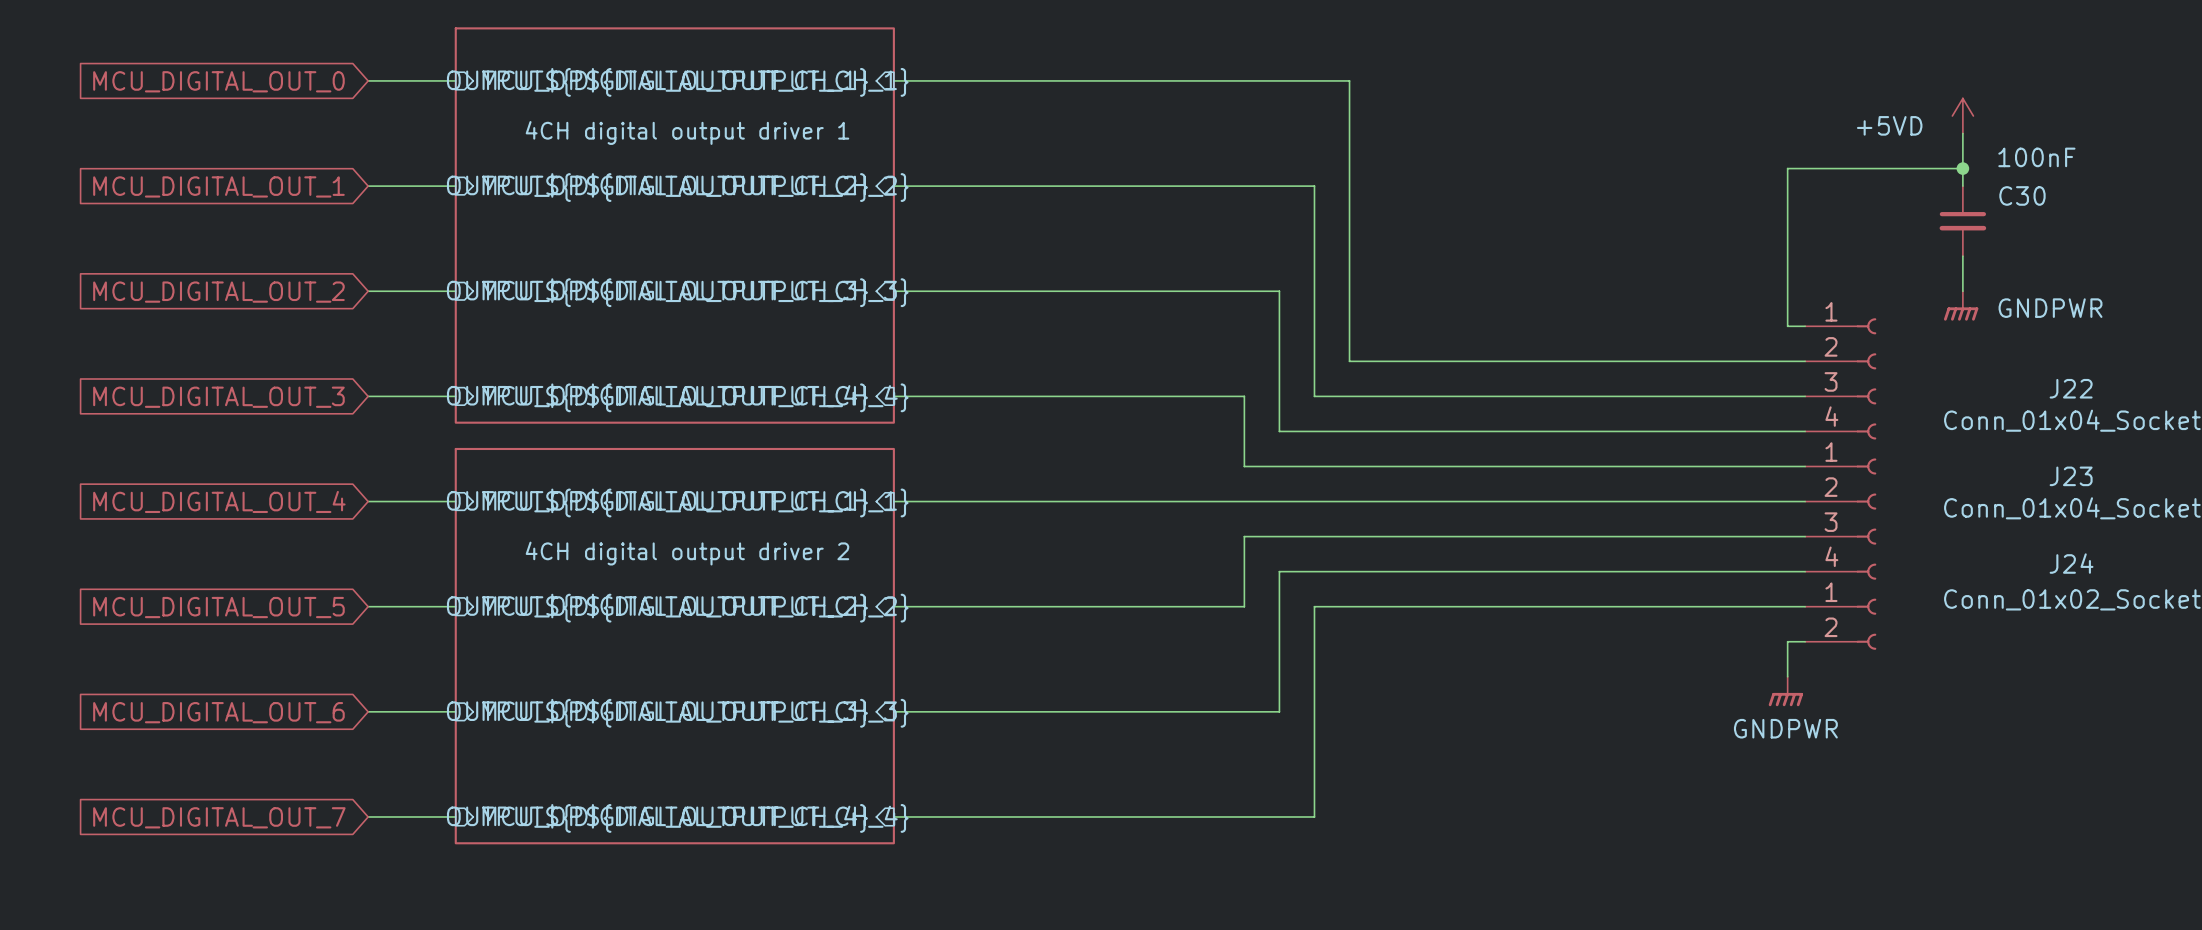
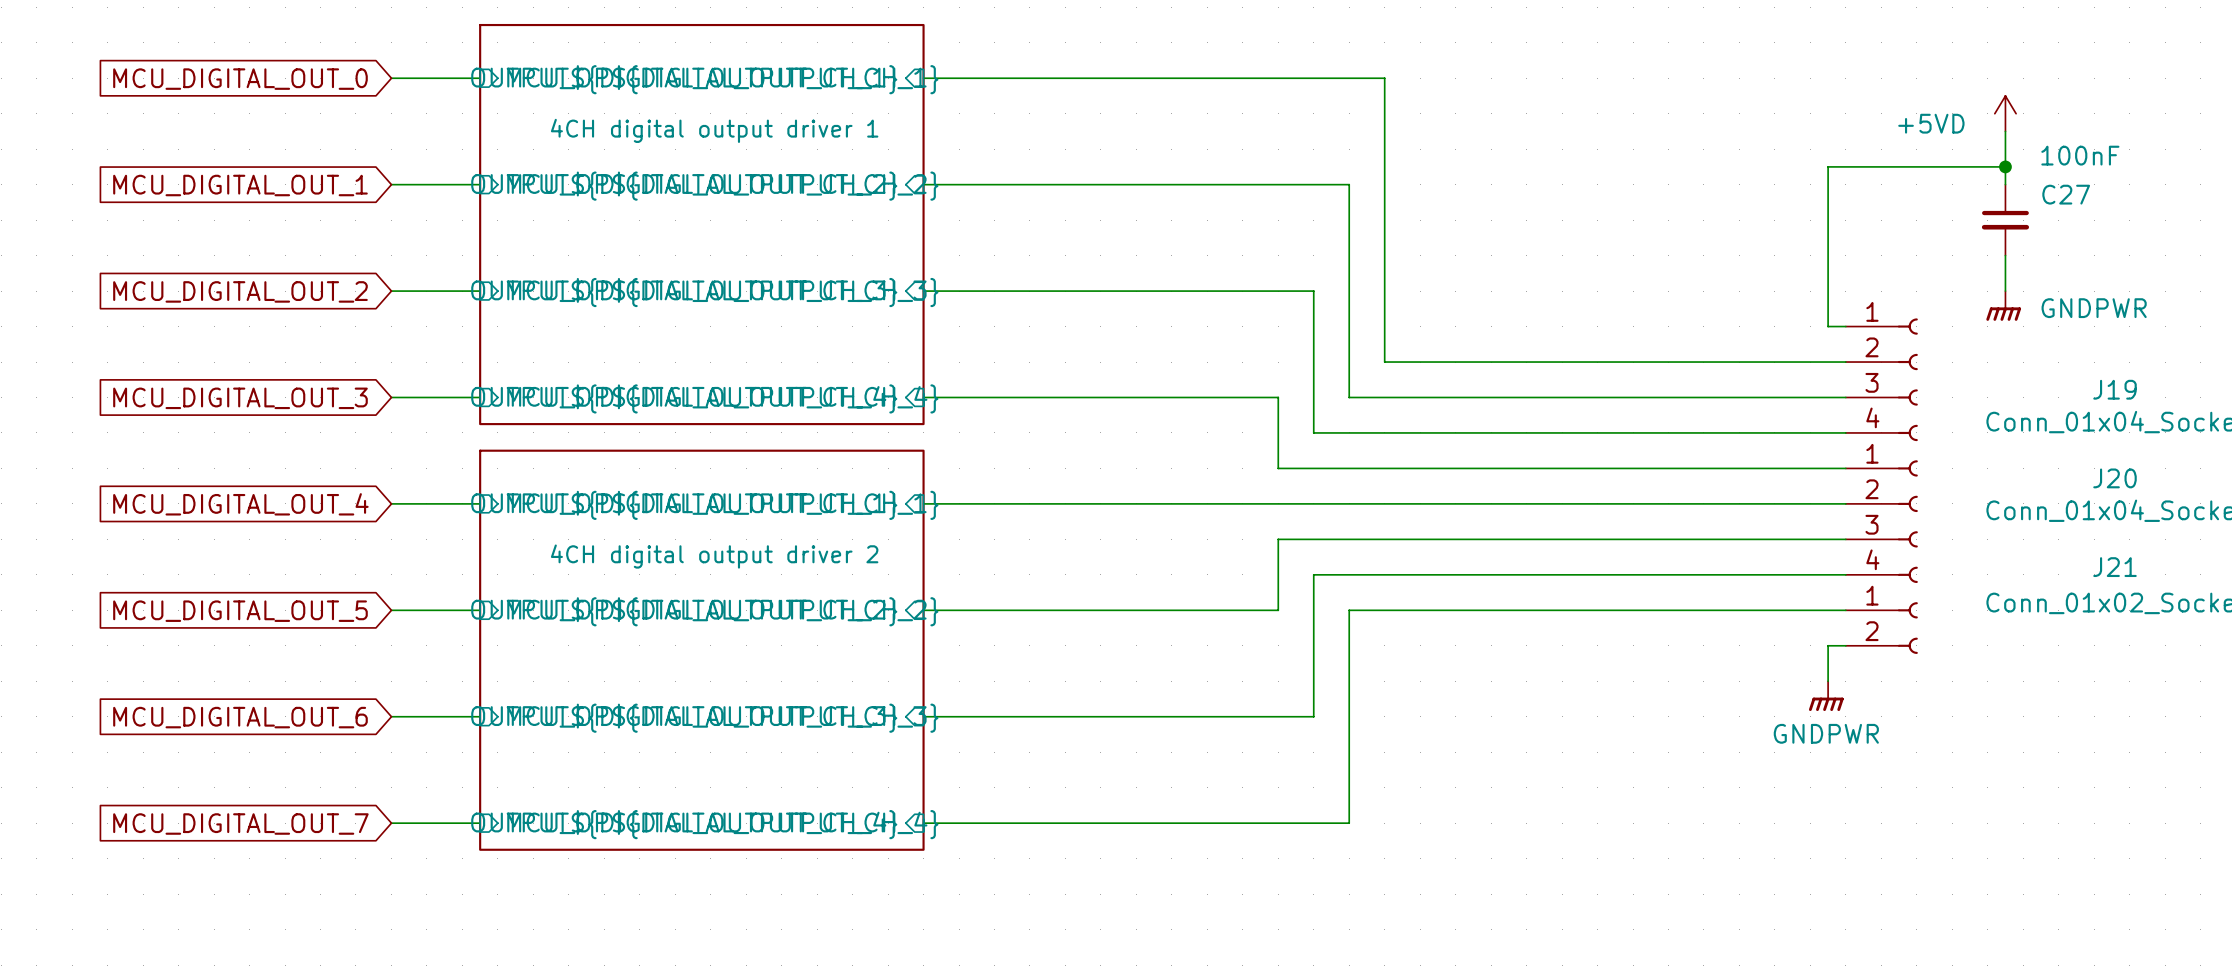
C30 name: C30 (2022, 195) -> C27 (2066, 194)
J22 name: J22 (2071, 388) -> J19 (2115, 389)
J23 name: J23 (2071, 476) -> J20 (2115, 478)
J24 name: J24 (2071, 563) -> J21 (2115, 567)

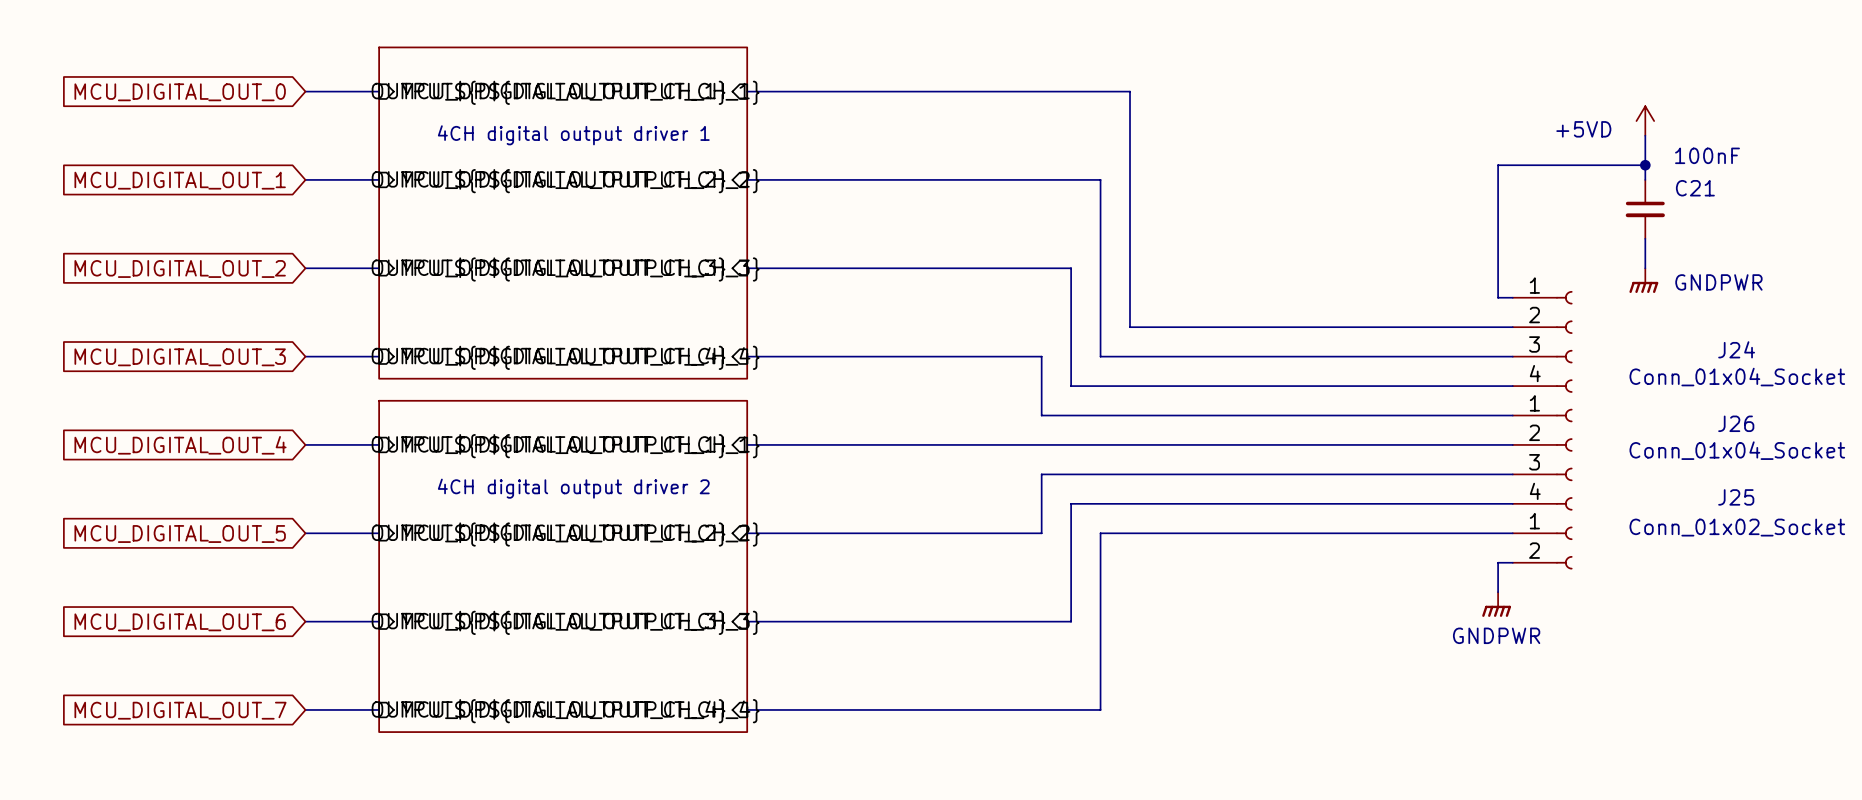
C27 name: C27 (2066, 194) -> C21 (1695, 188)
J19 name: J19 (2115, 389) -> J24 (1736, 349)
J20 name: J20 (2115, 478) -> J26 (1736, 423)
J21 name: J21 (2115, 567) -> J25 (1736, 497)

